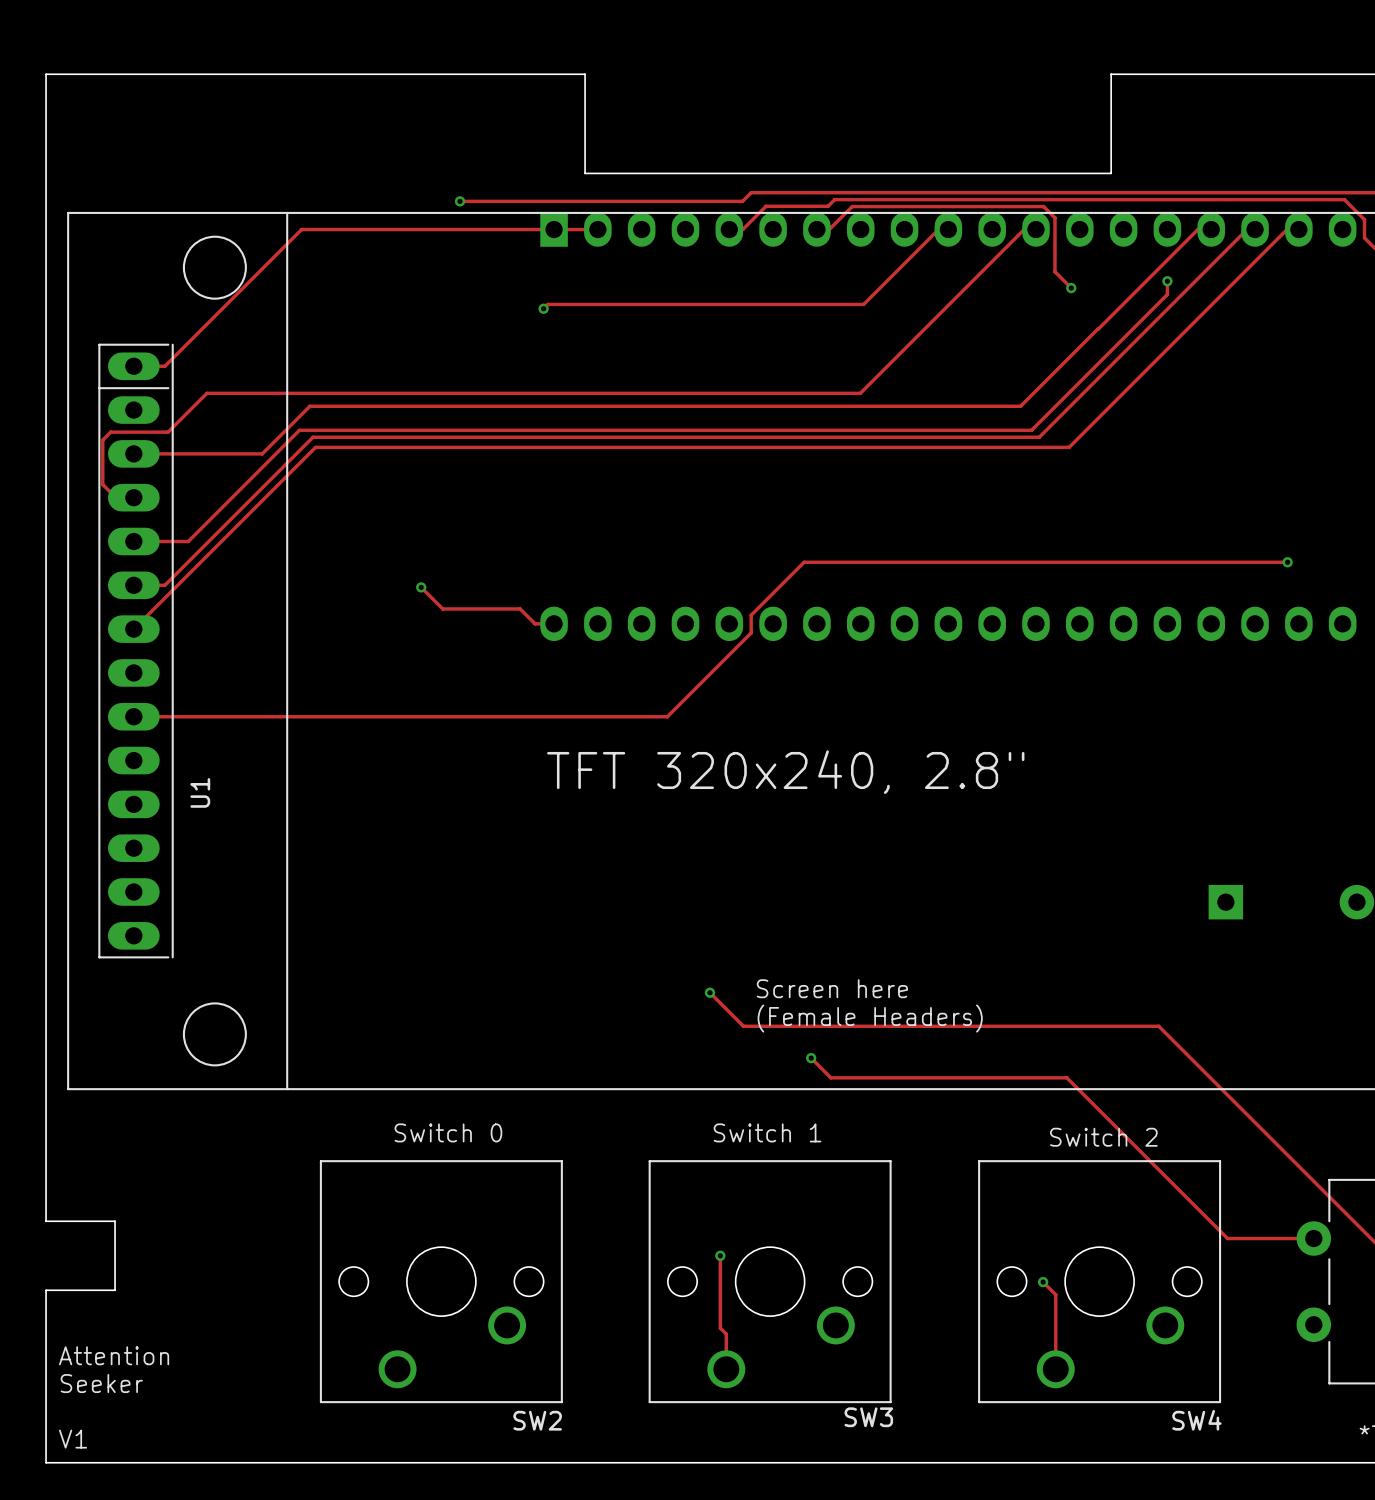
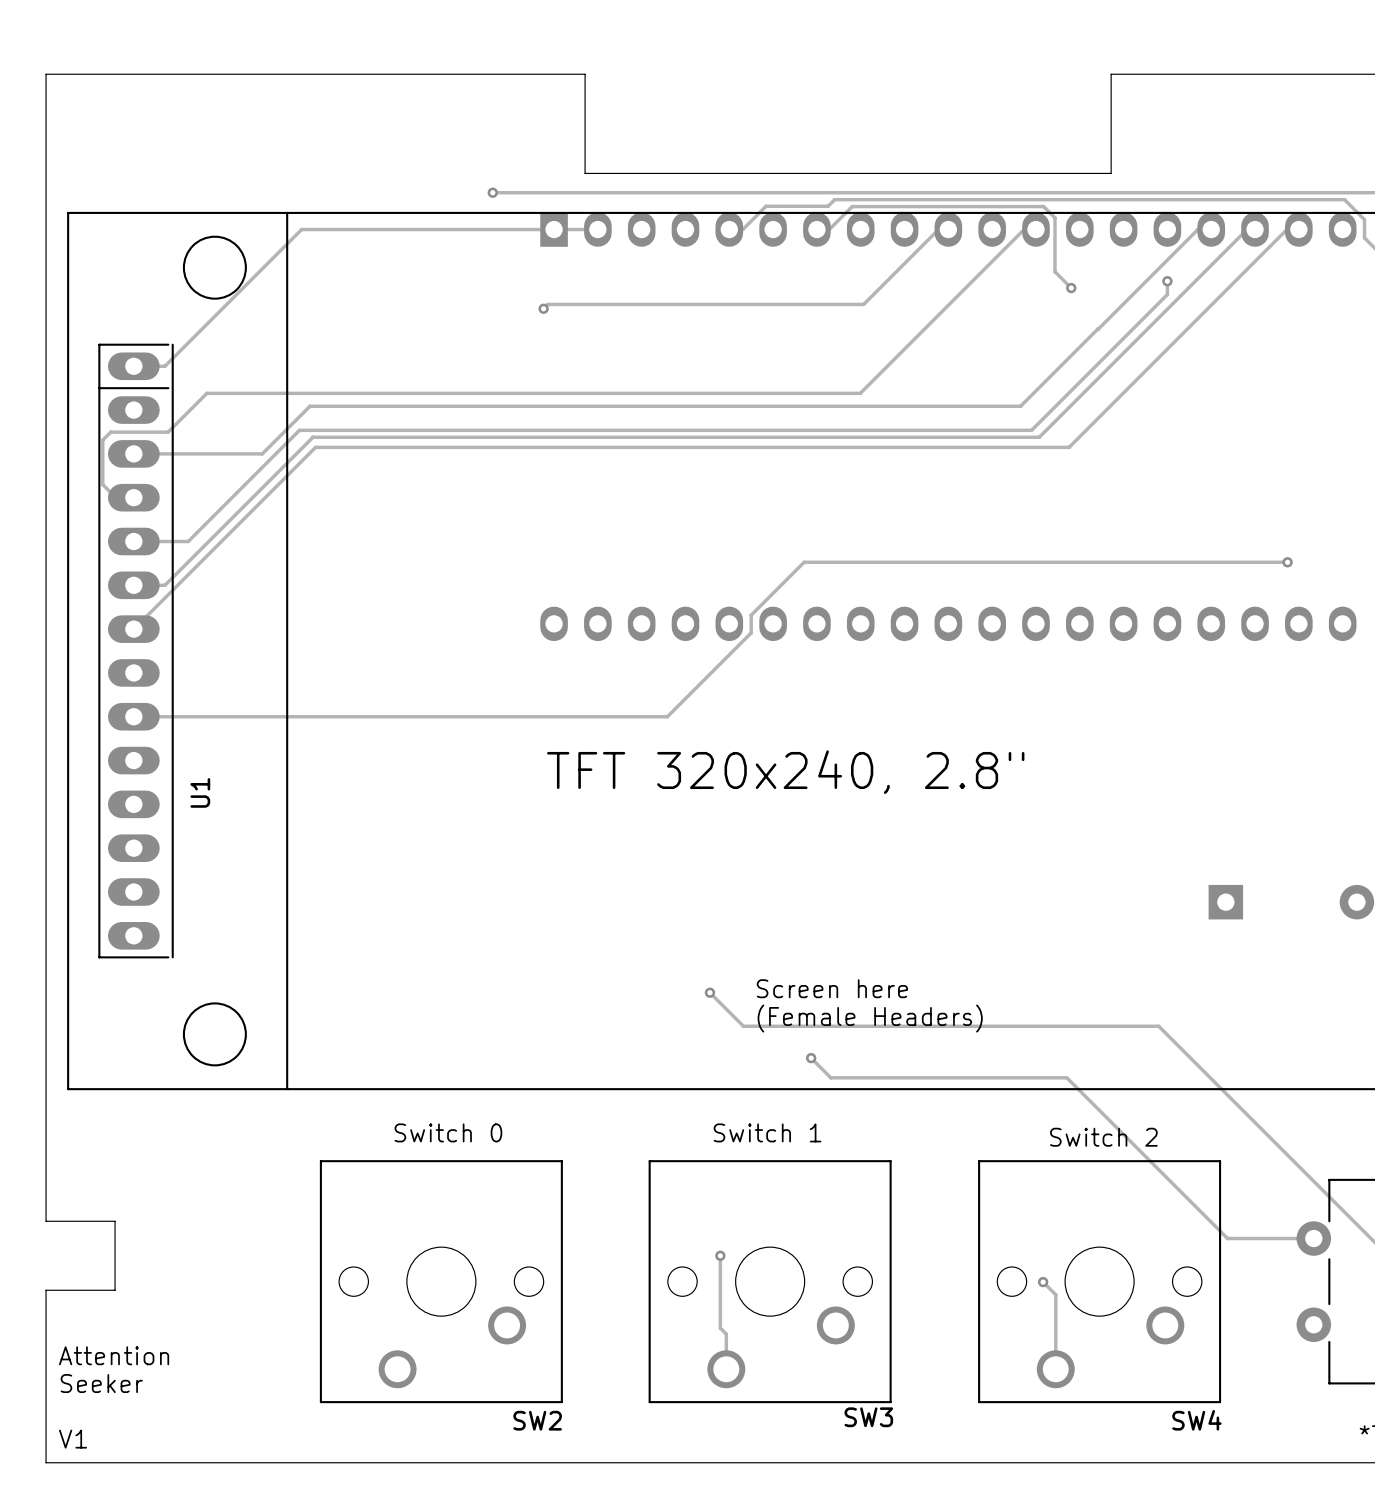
track: (751, 192) (742, 201) (460, 201) -> (751, 192) (492, 192)
via position: (460, 201) -> (492, 192)
track: (421, 587) (442, 608) (520, 608) (535, 623) (554, 623) -> none
via: (421, 587) -> none

